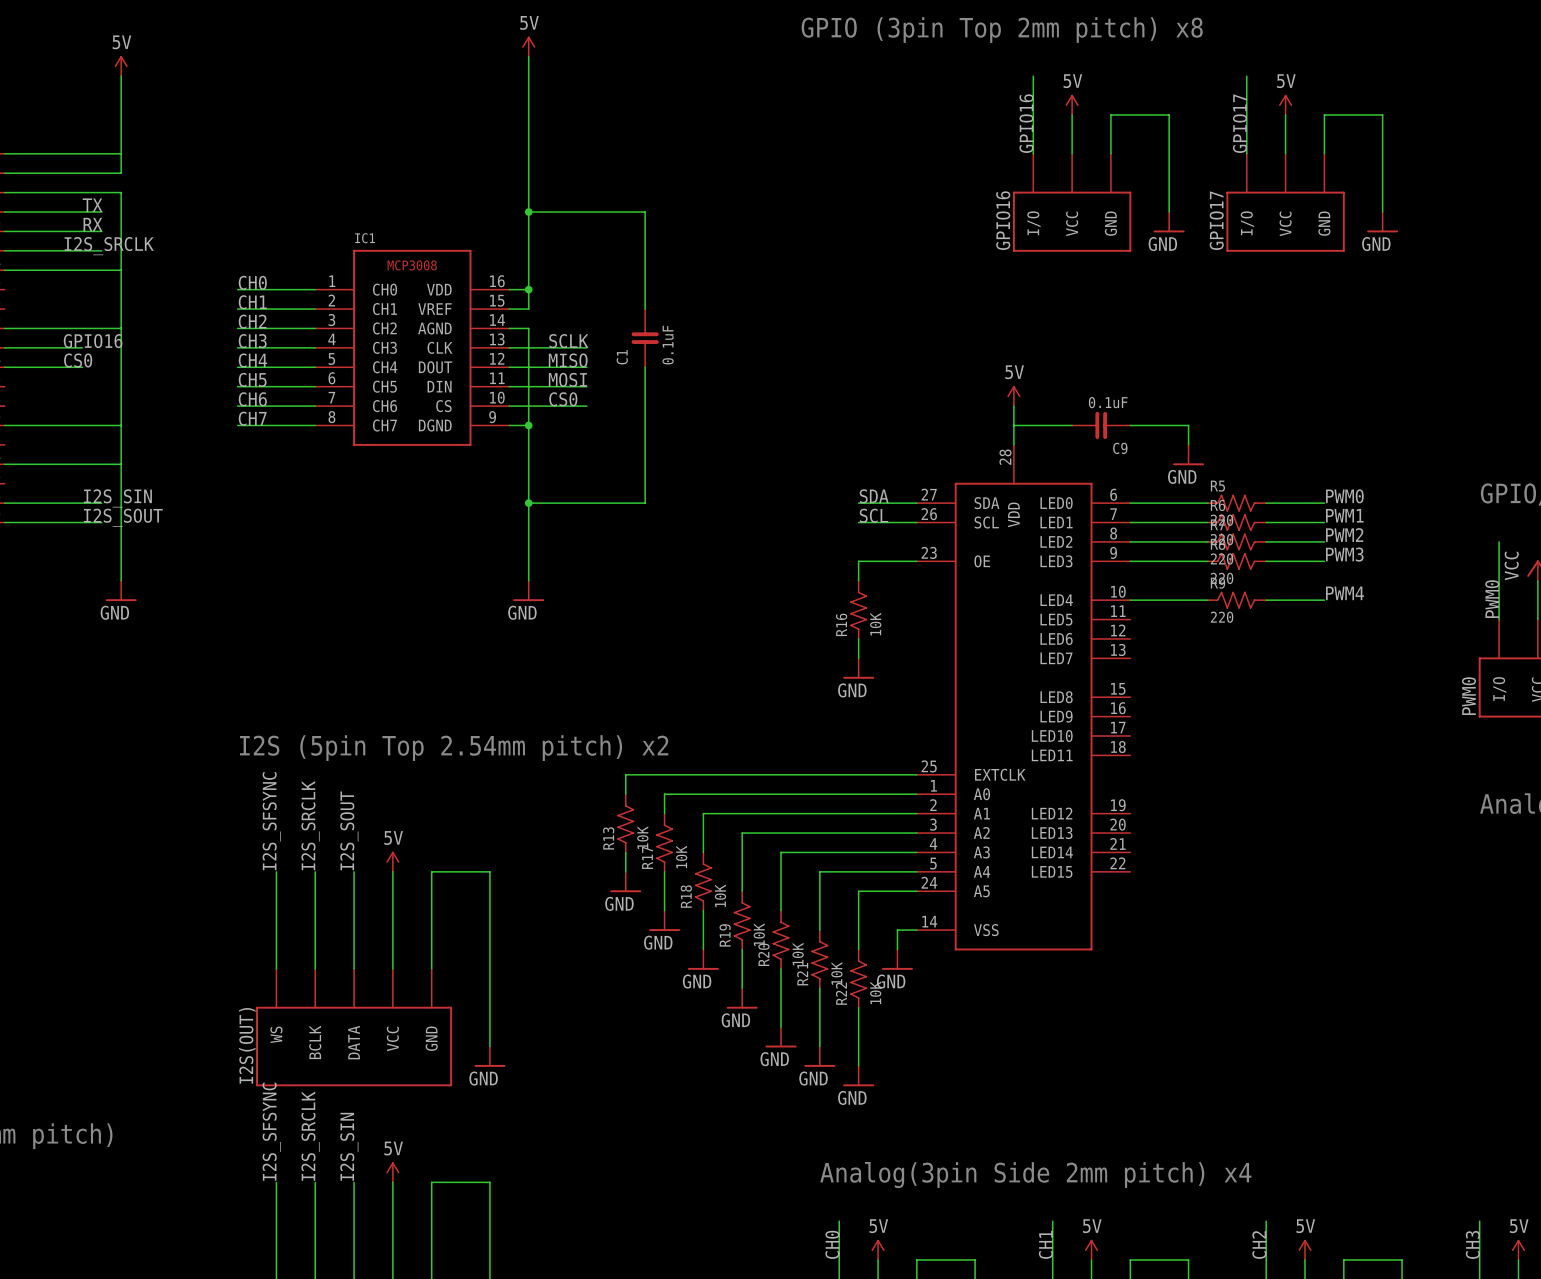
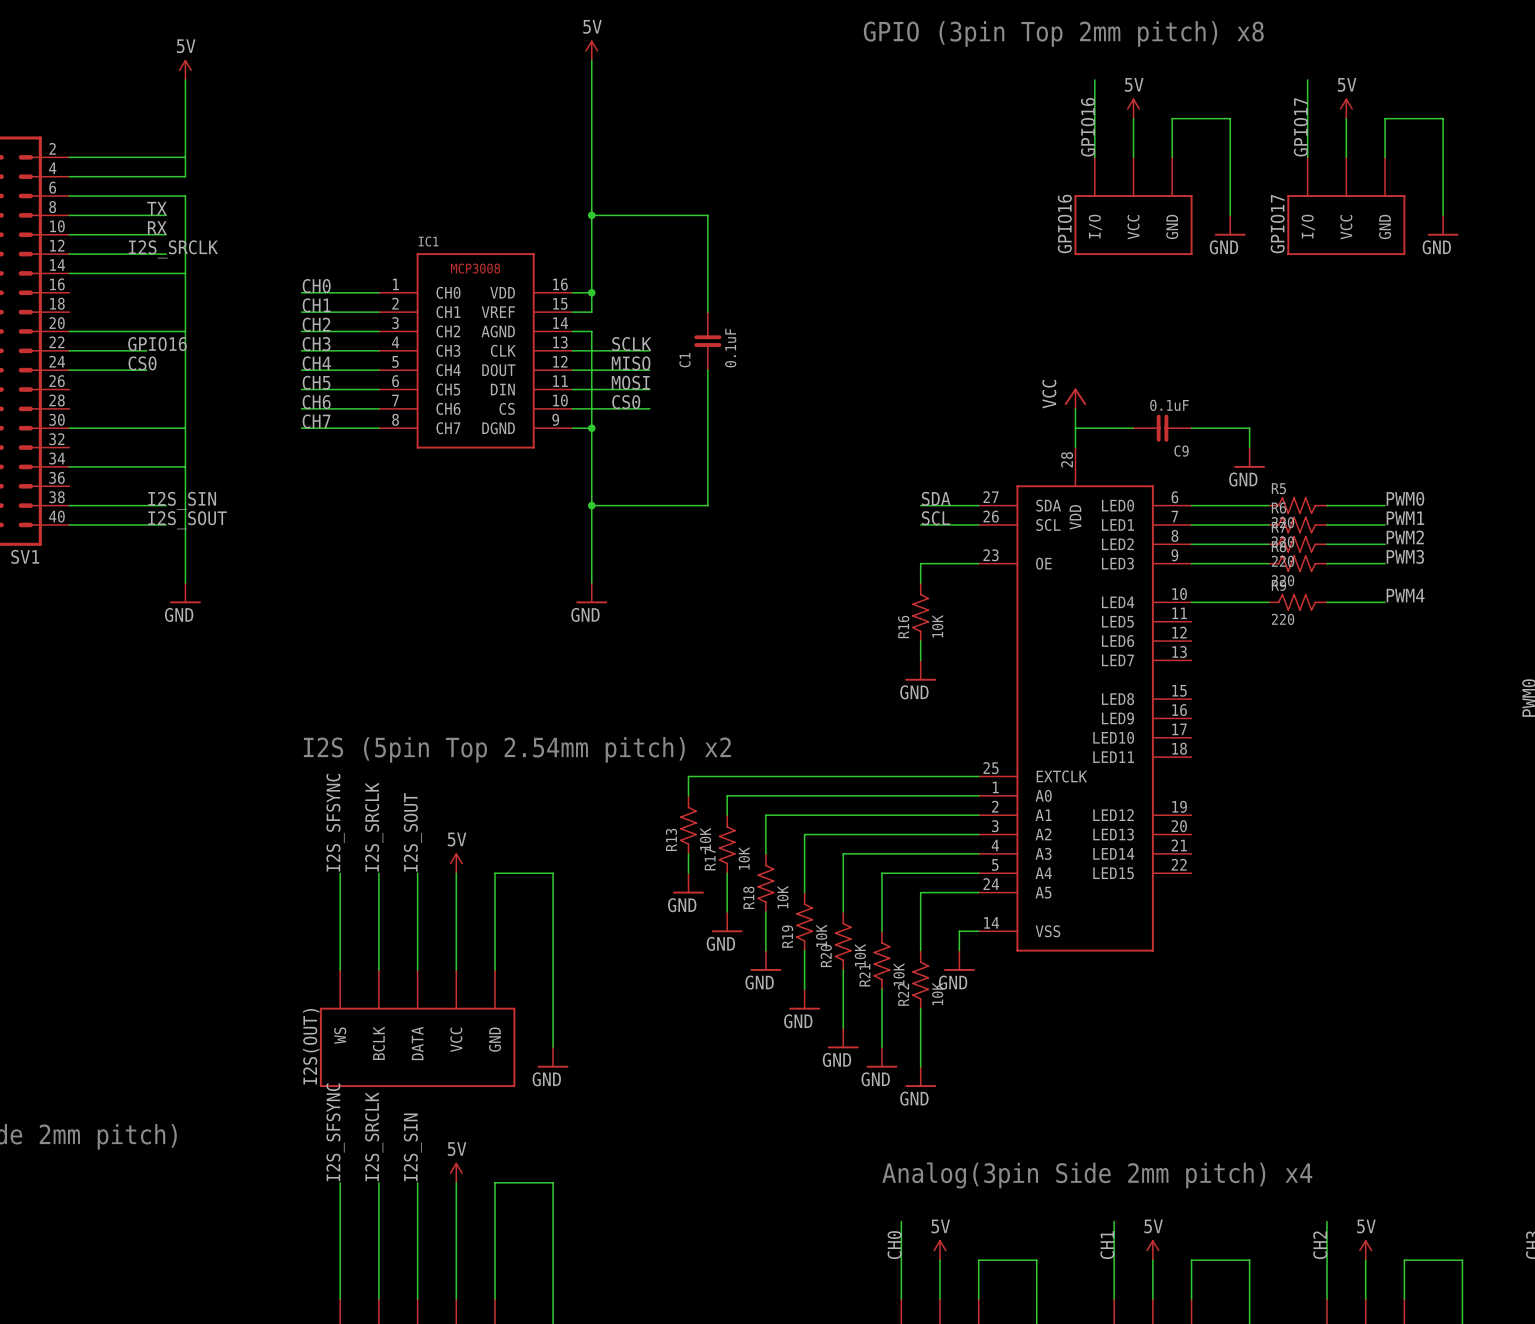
power symbol: 5V (1013, 395) -> VCC (1075, 398)

